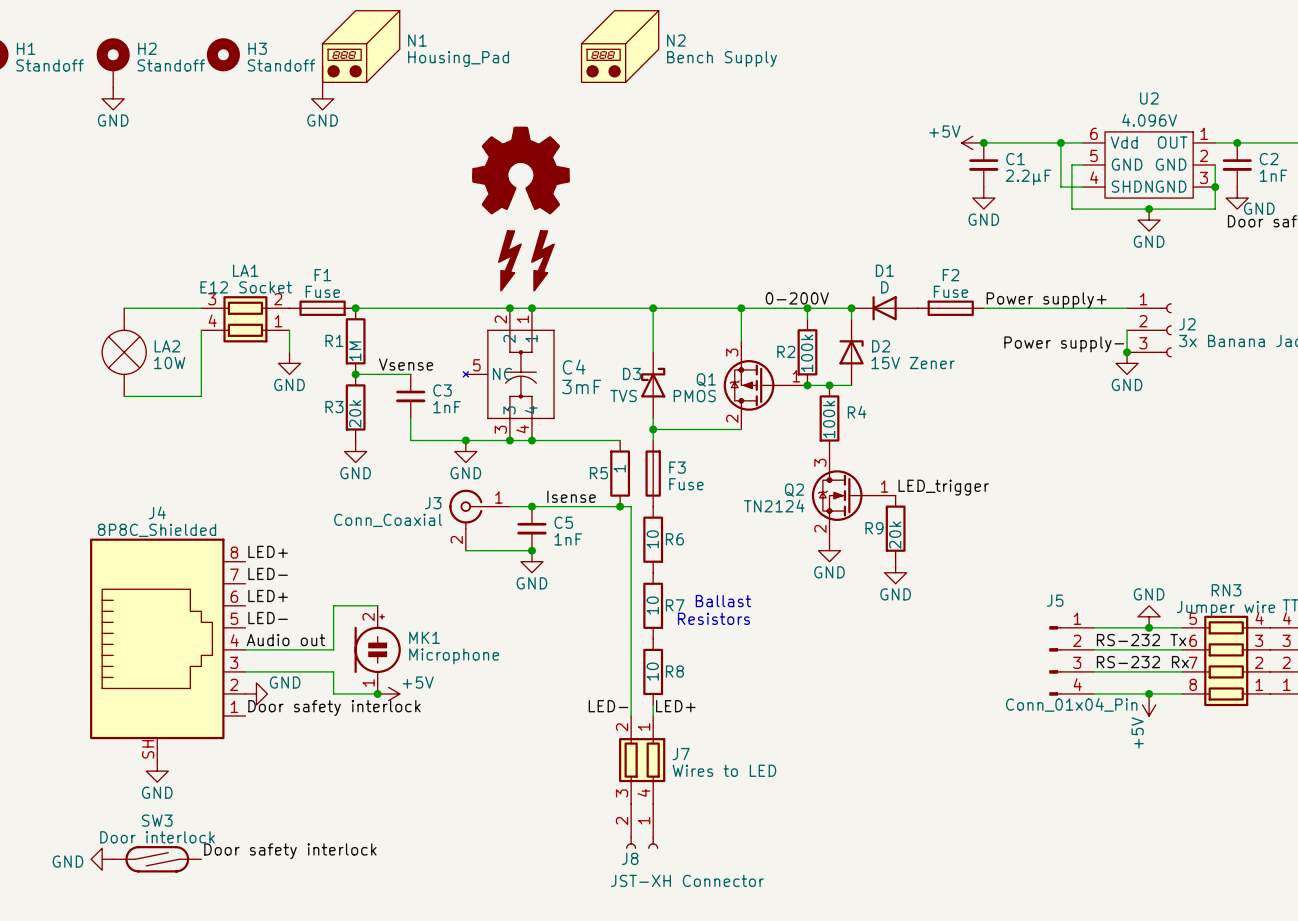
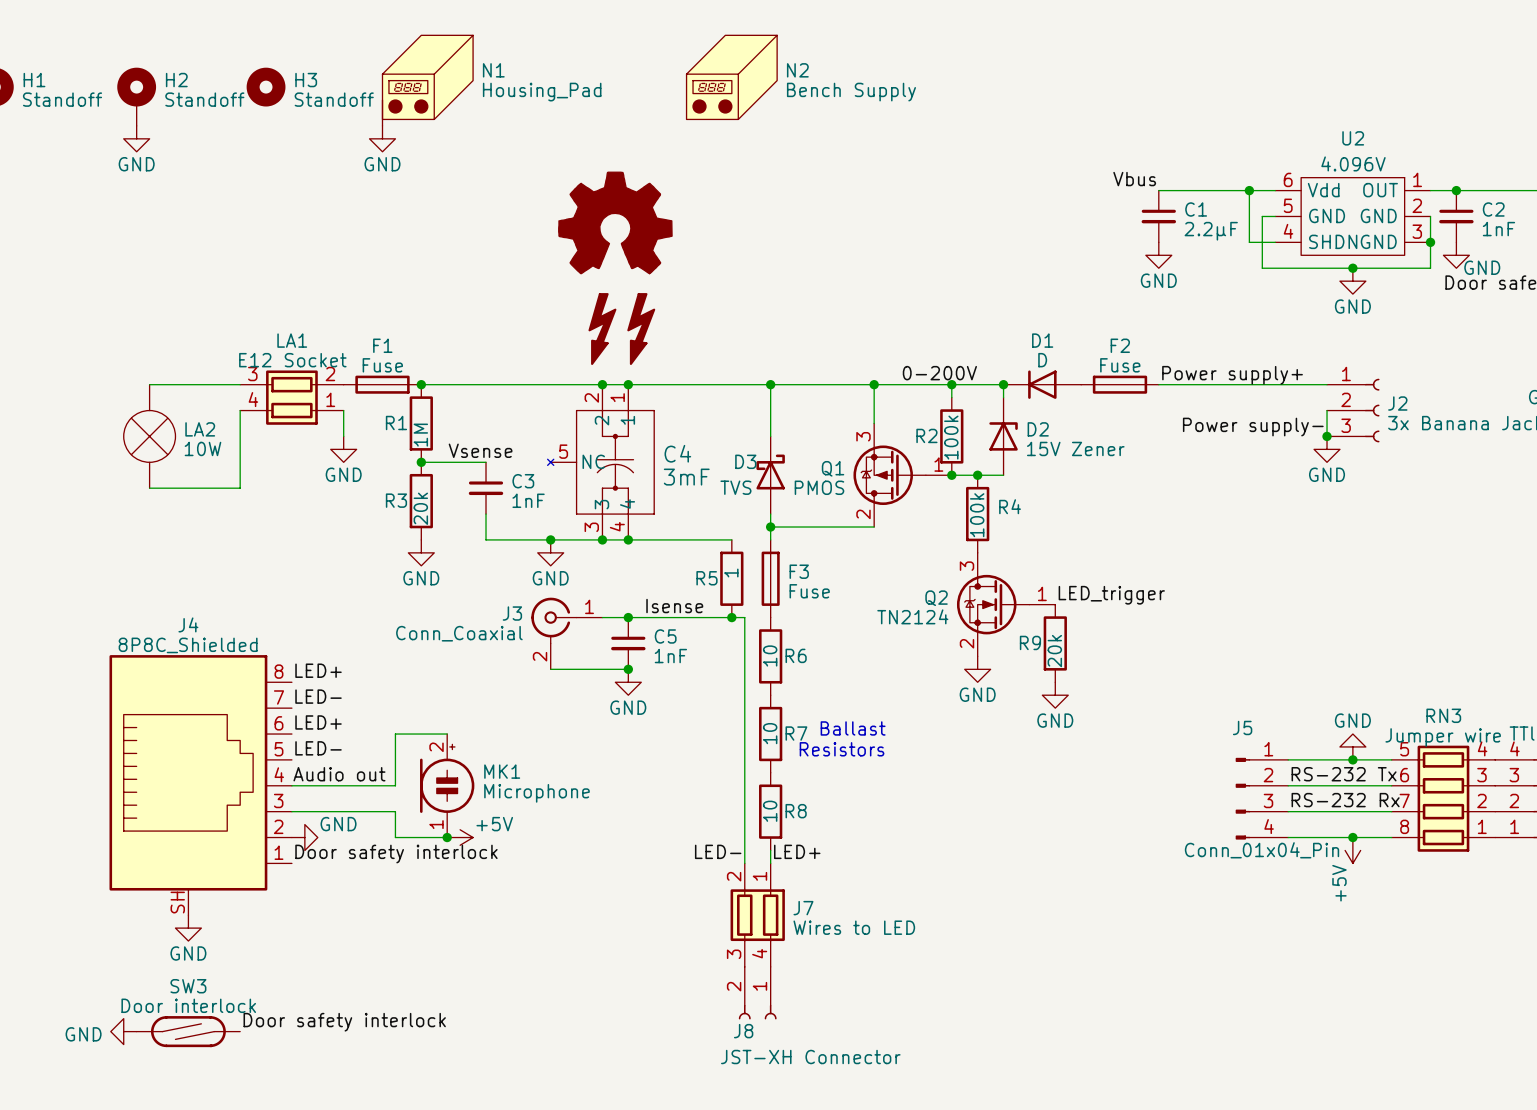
label: none -> Vbus (1134, 179)
power symbol: +5V (972, 142) -> none
junction: (983, 142) -> none

